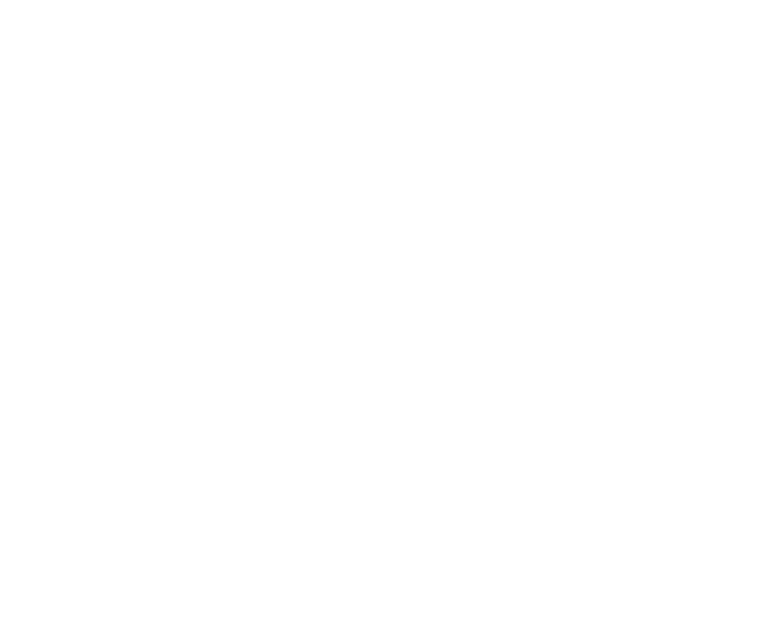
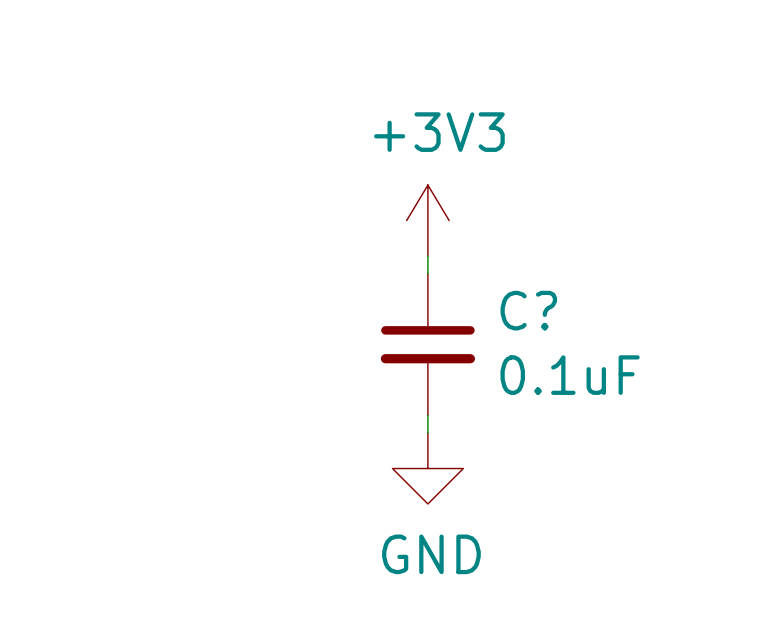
power symbol: none -> +3V3 (427, 220)
wire: none -> (427, 255) (427, 273)
C?: none -> 0.1uF (427, 344)
wire: none -> (427, 415) (427, 433)
power symbol: none -> GND (427, 468)

